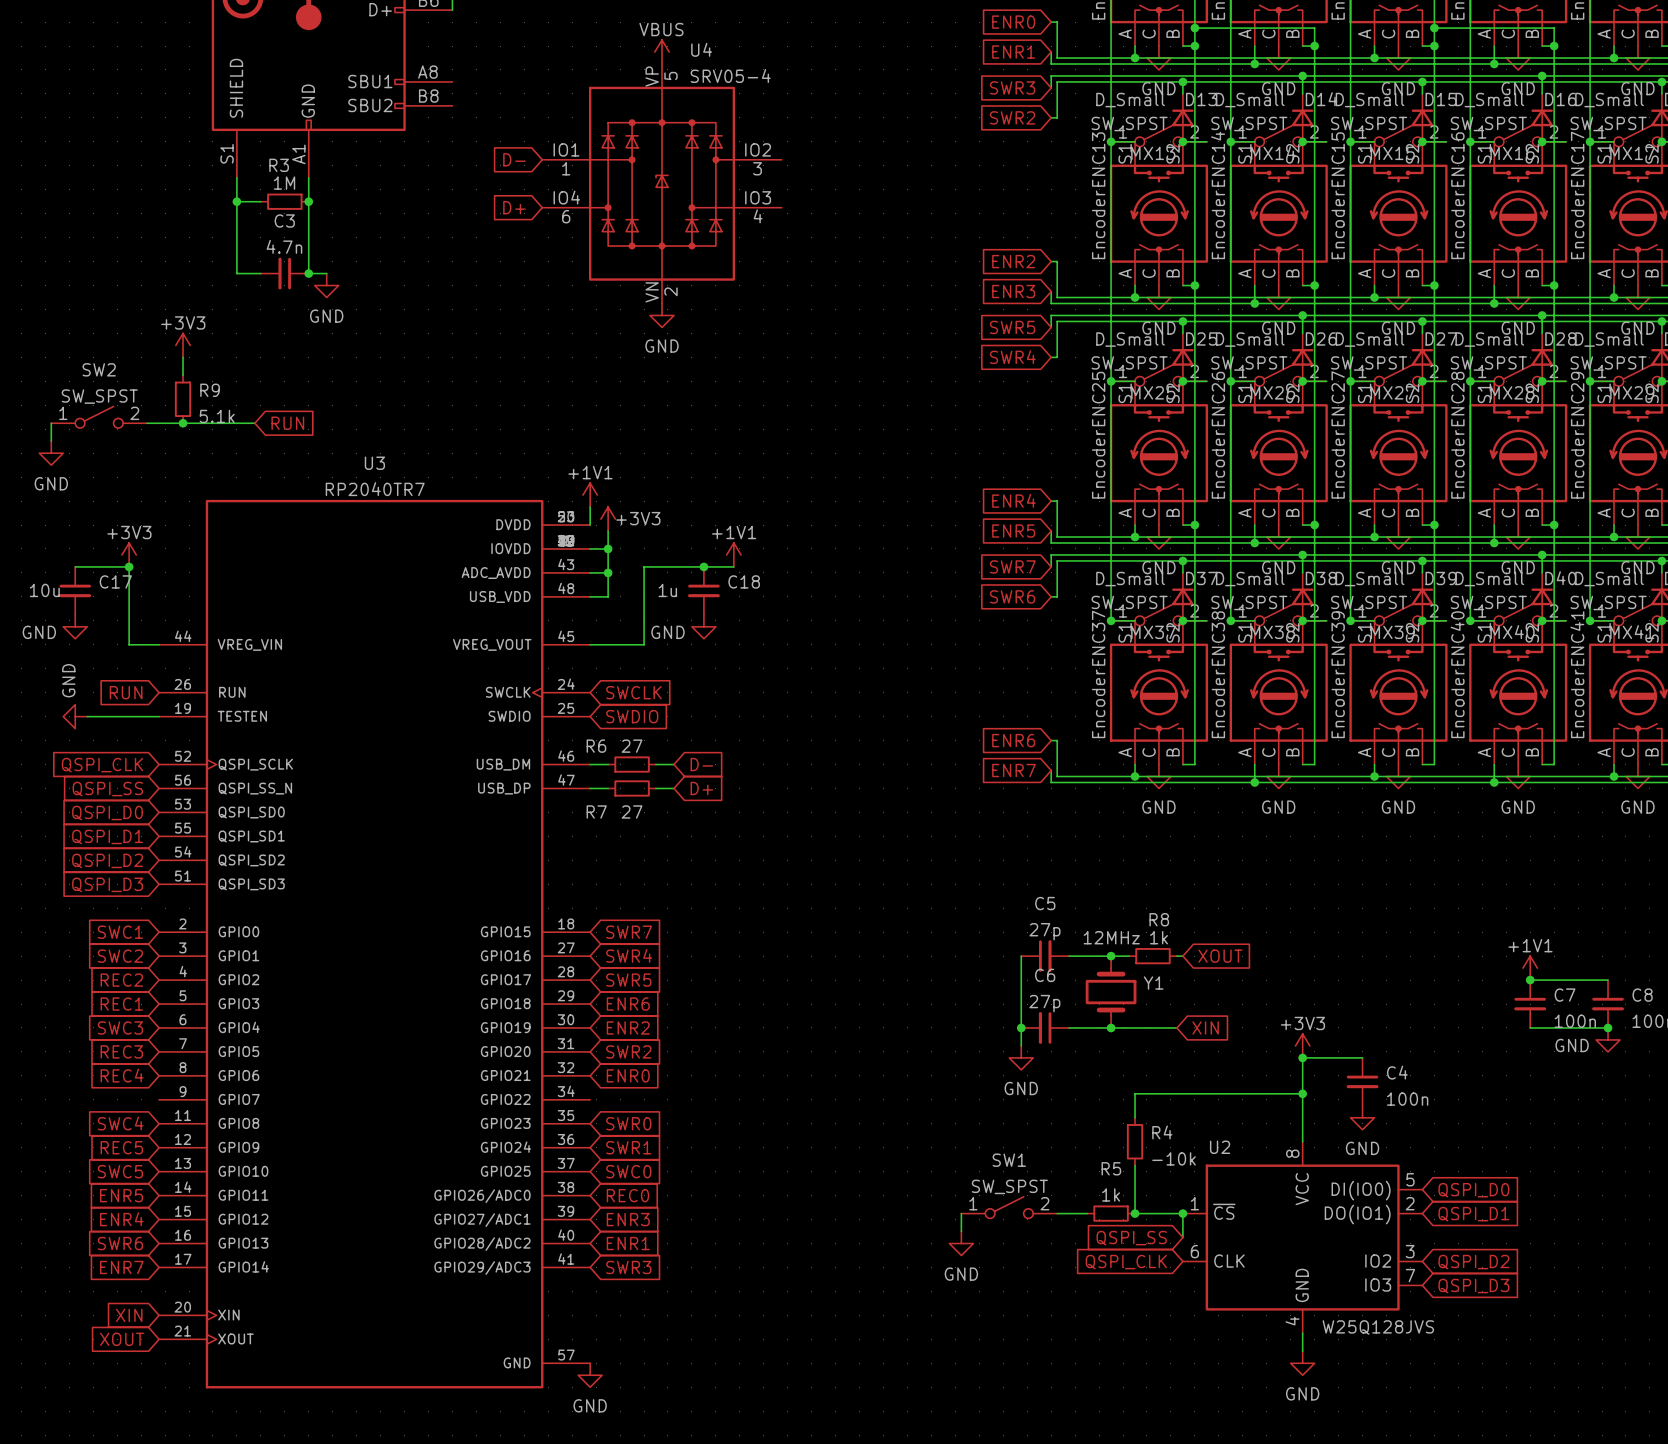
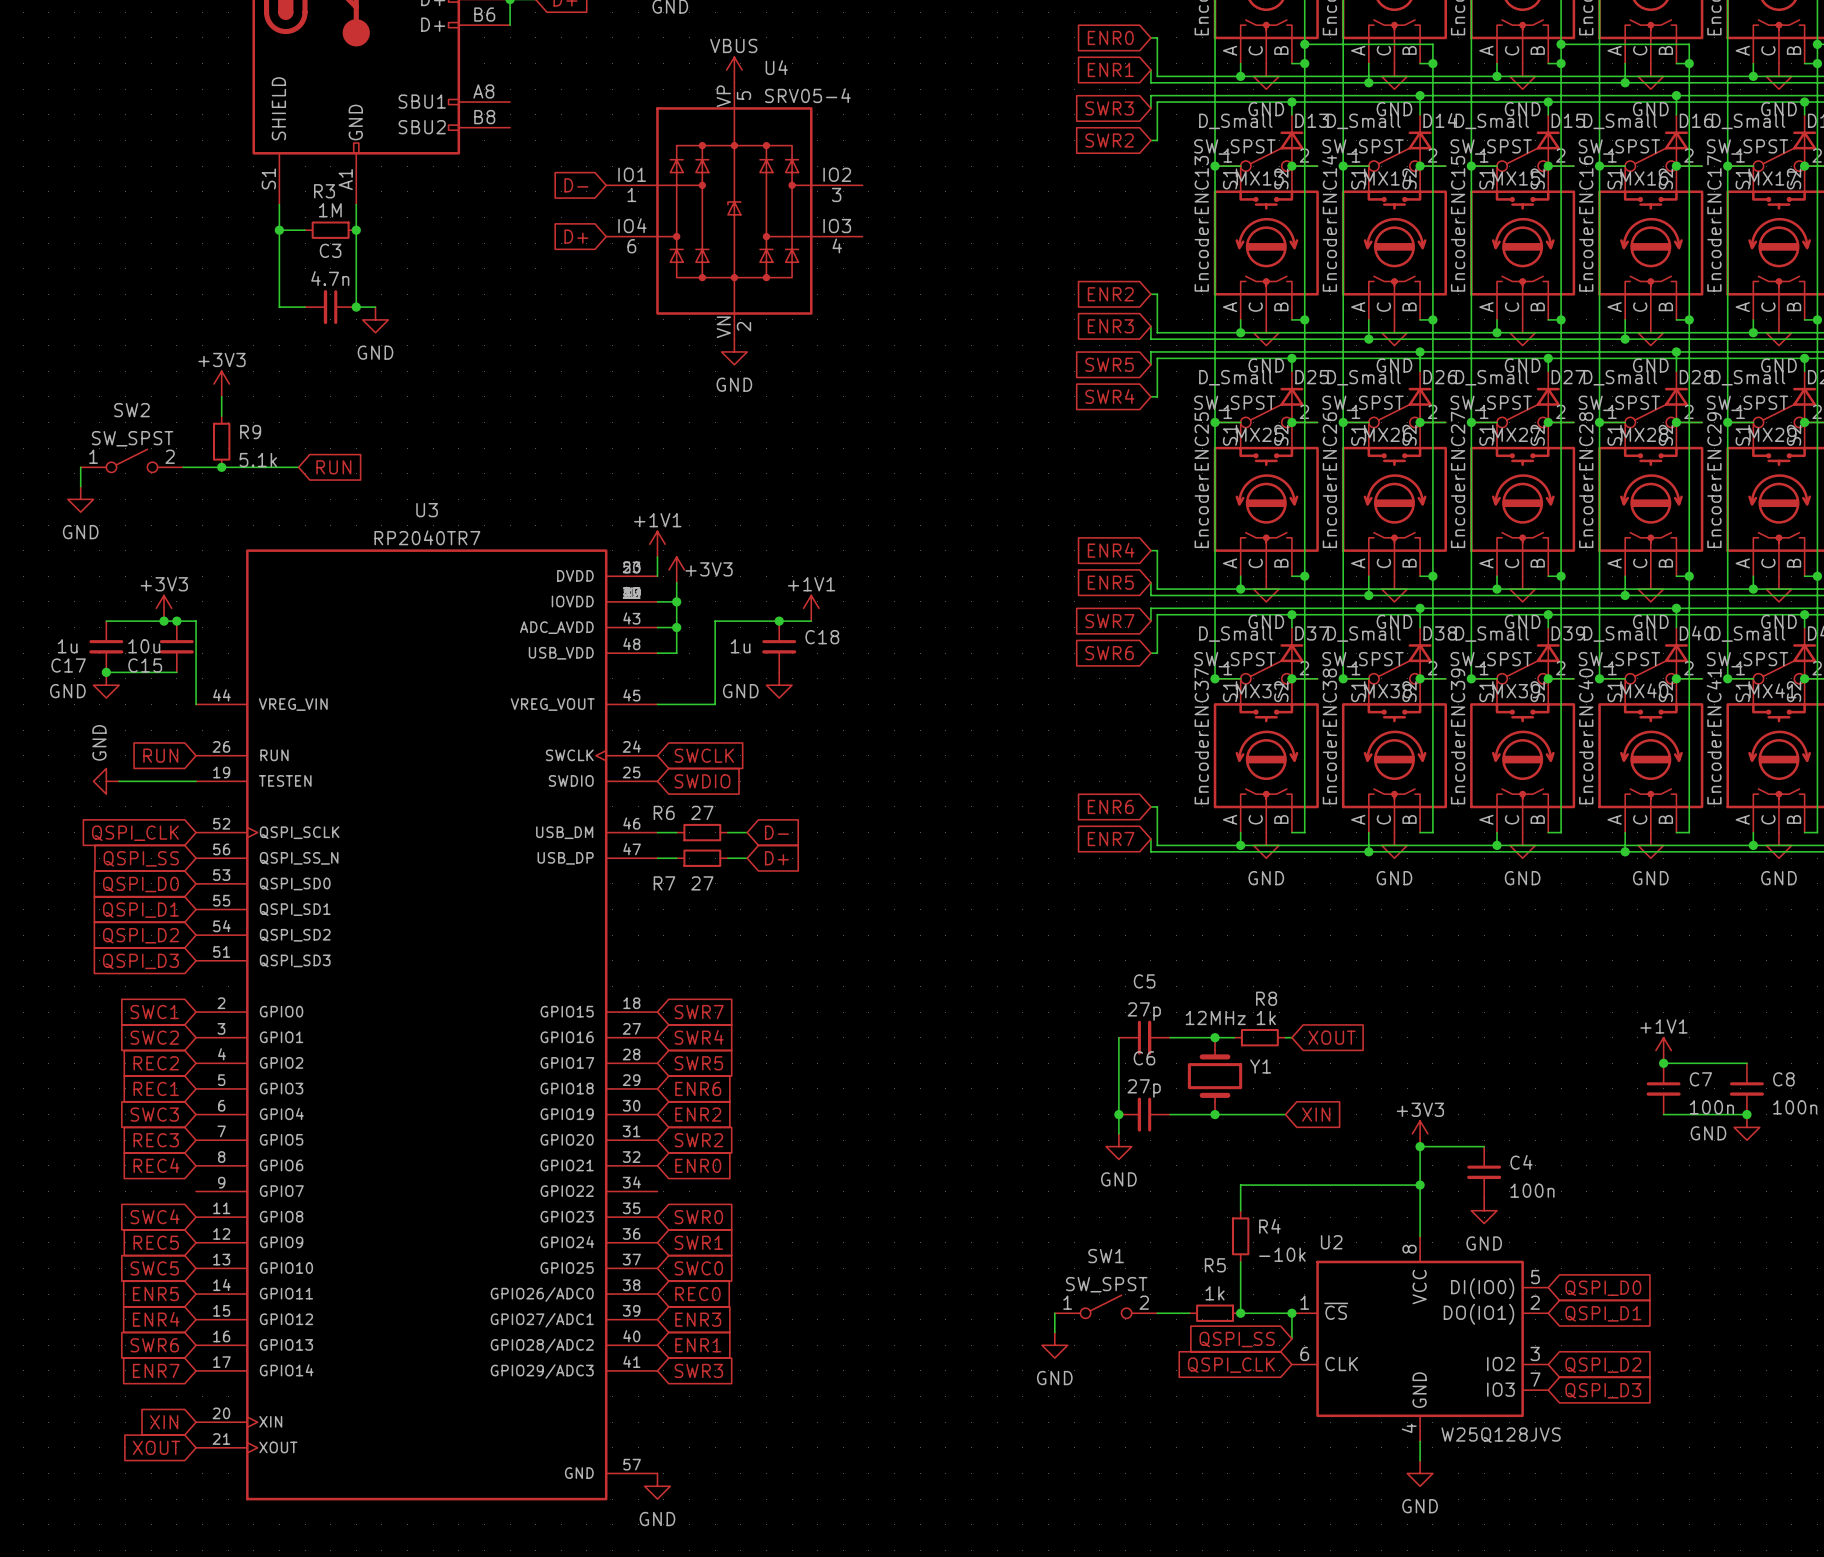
wire: (129, 566) (129, 644) (159, 644) -> (164, 621) (196, 621) (196, 704)
junction: none -> (176, 621)
C17 name position: C17 (115, 581) -> C17 (68, 665)
C17 value: 10u (44, 590) -> 1u (67, 646)
C15: none -> 10u (176, 646)
wire: none -> (106, 672) (176, 672)
junction: none -> (106, 672)

